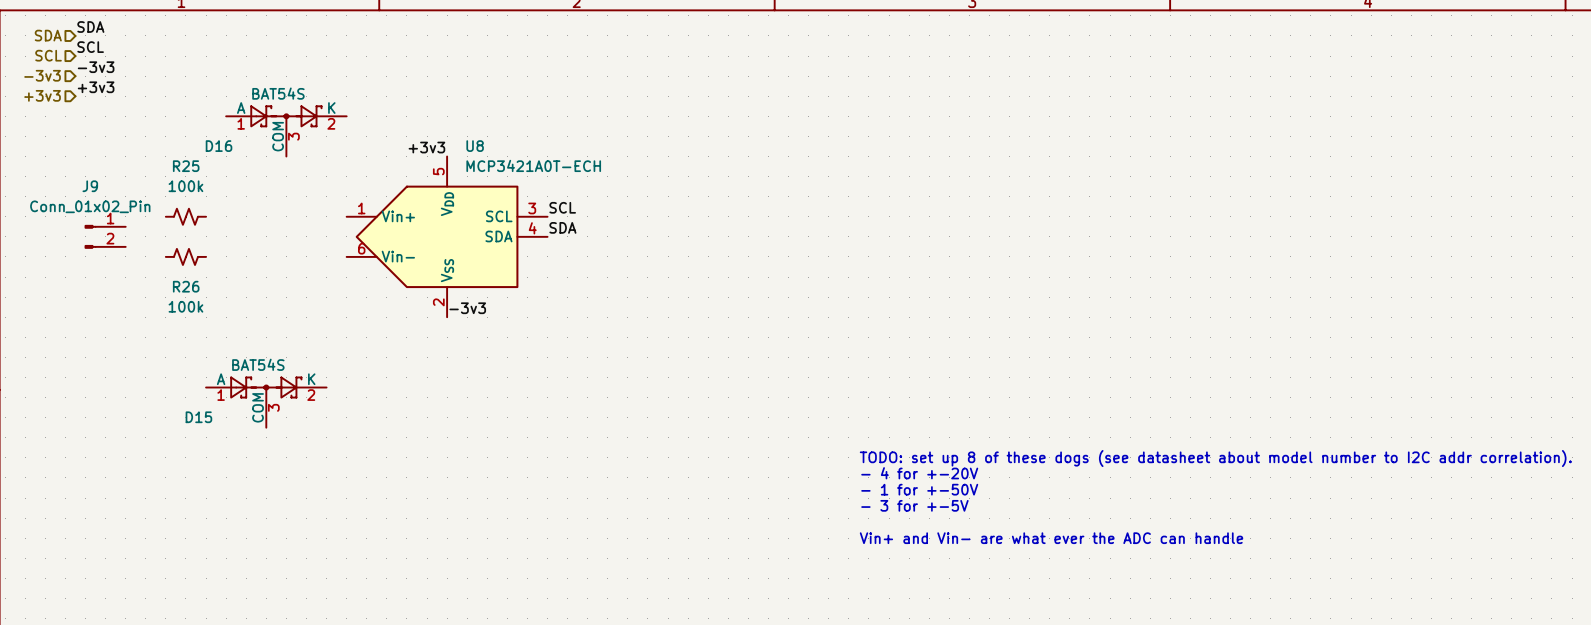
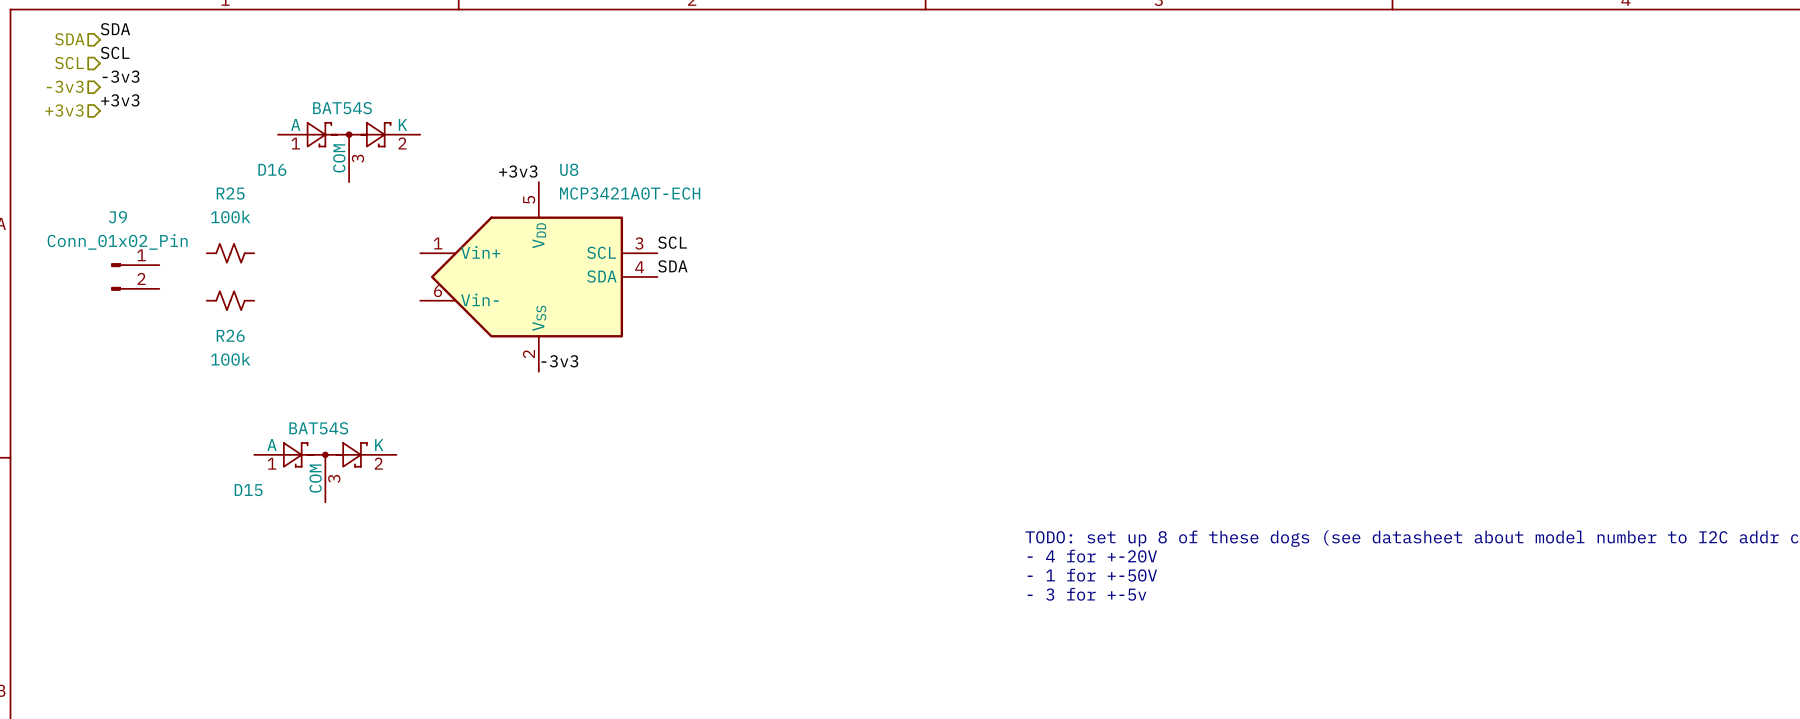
text: - 3 for +-5V (914, 505) -> - 3 for +-5v (1086, 594)
text: Vin+ and Vin- are what ever the ADC can handle (1051, 538) -> none

